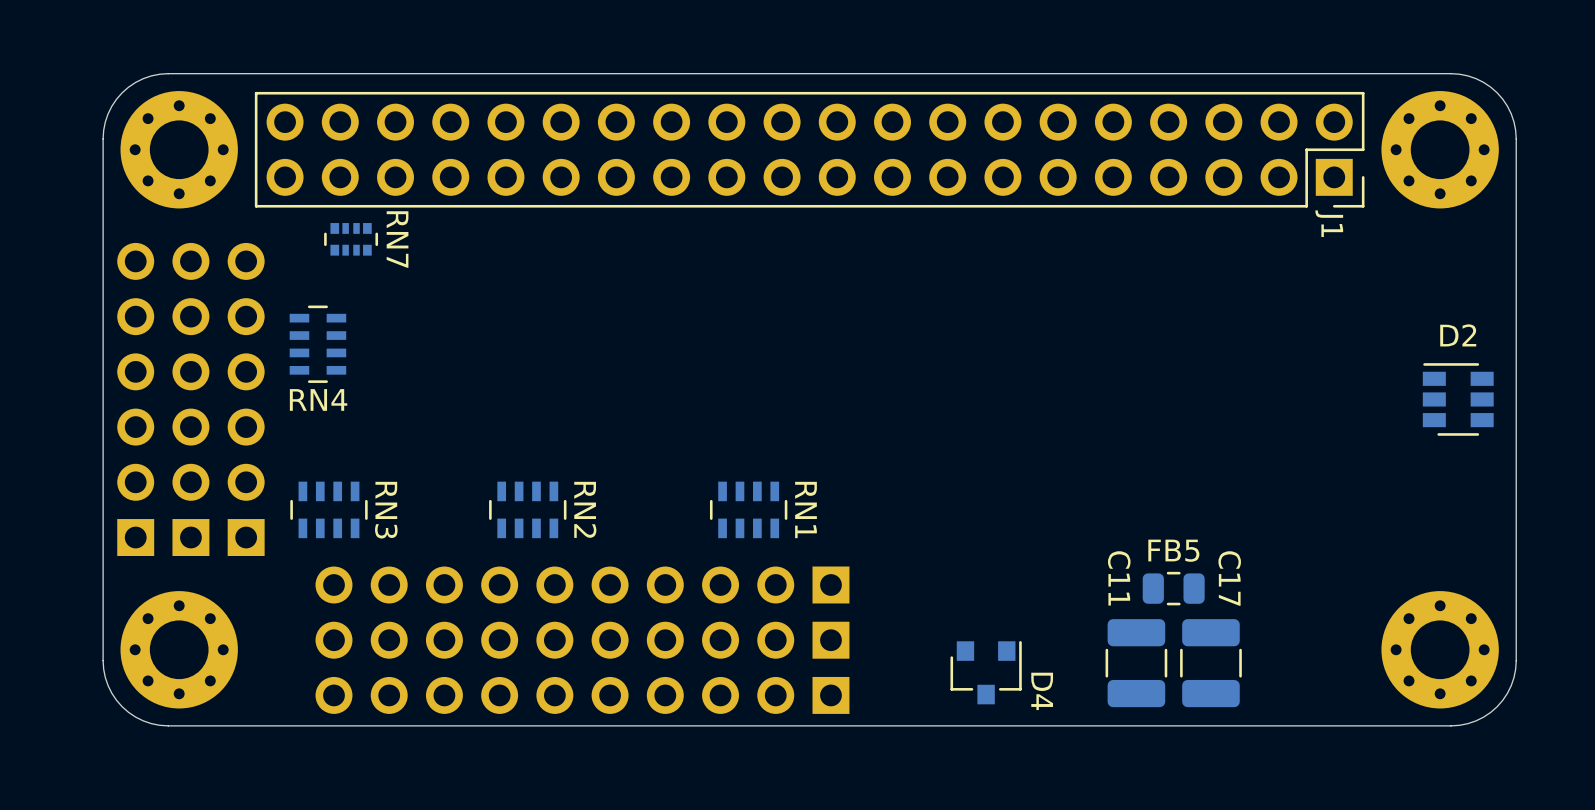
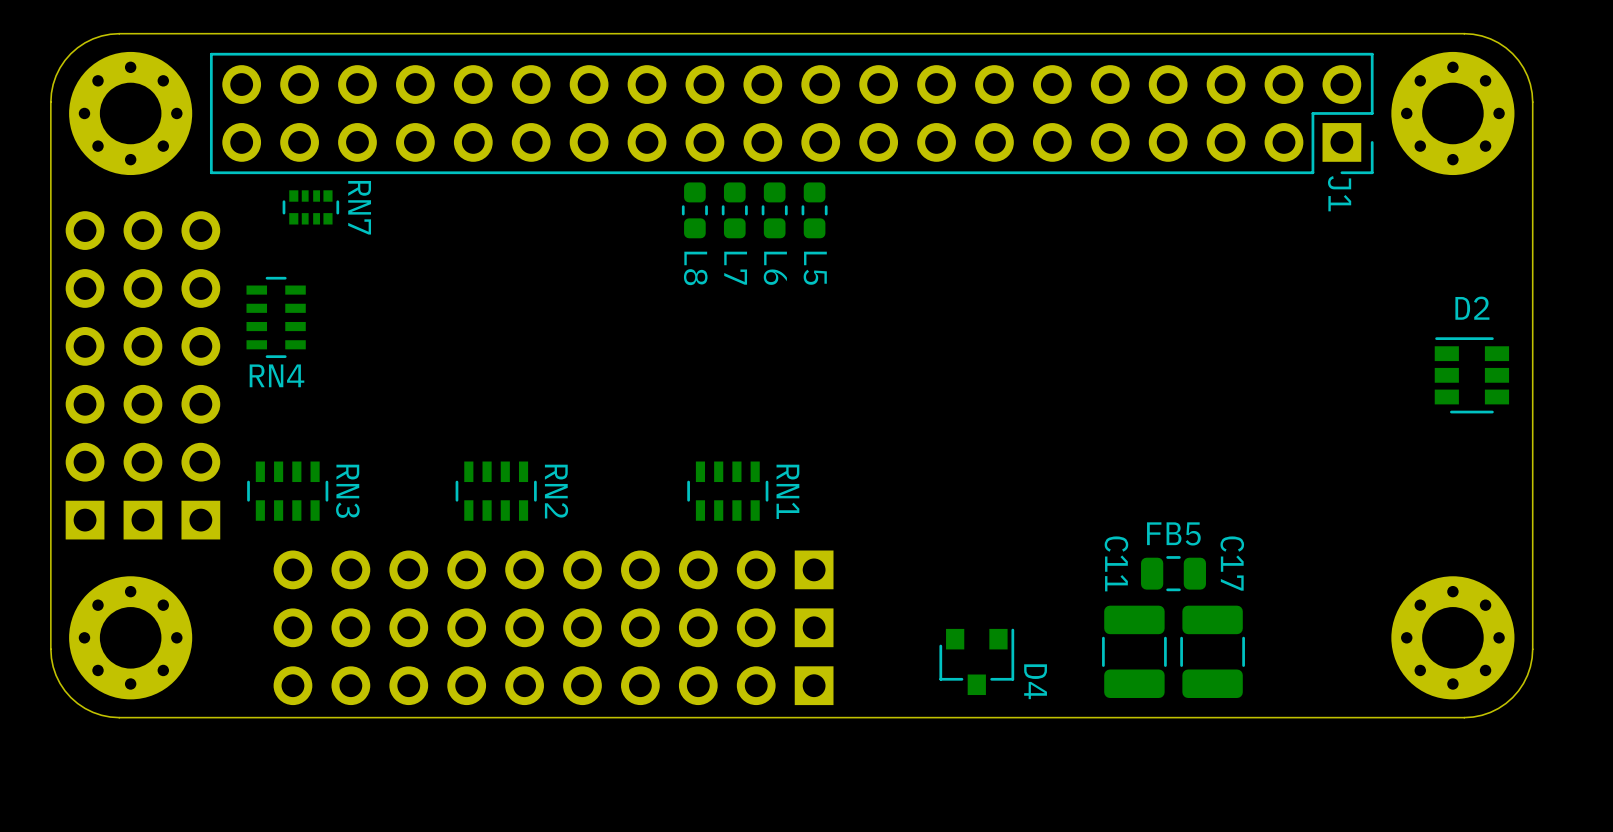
L8: none -> (694, 210)
L7: none -> (734, 210)
L6: none -> (774, 210)
L5: none -> (814, 210)

